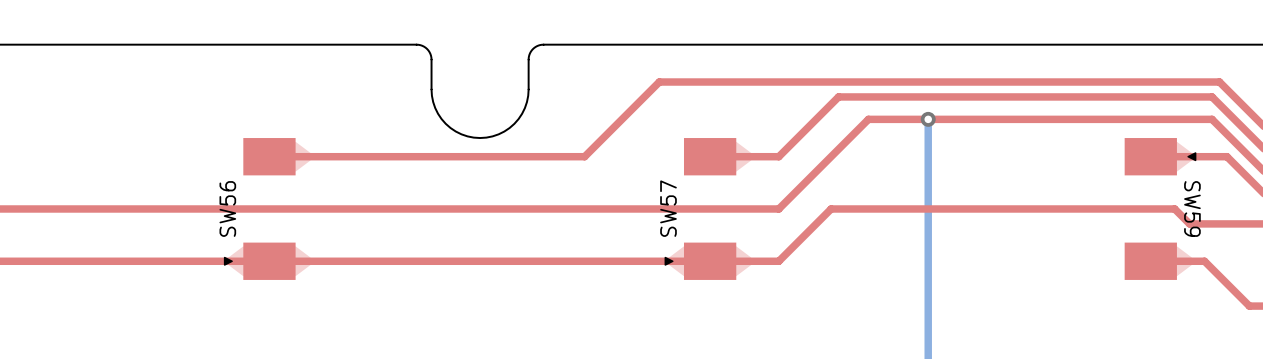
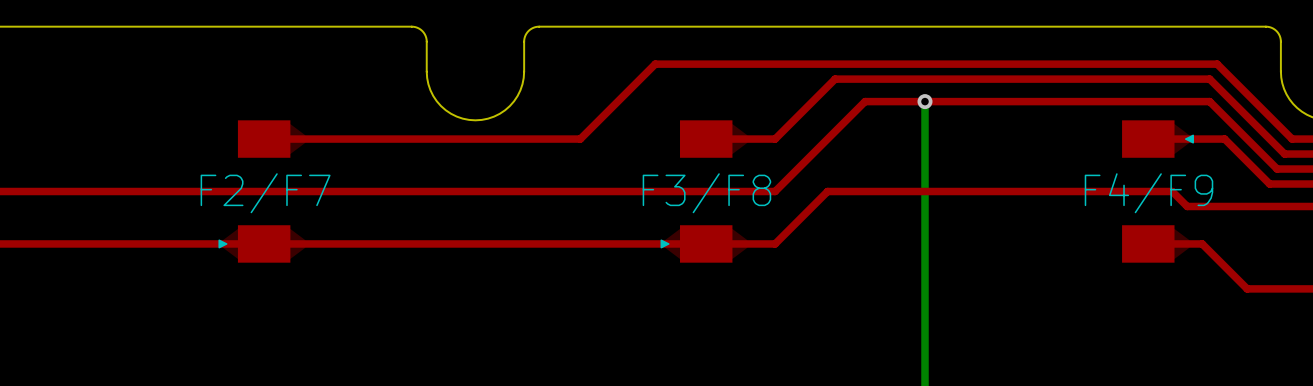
SW56 name: SW56 (227, 208) -> none
SW57 name: SW57 (668, 208) -> none
SW59 name: SW59 (1192, 208) -> none
SW56 value: none -> F2/F7 (265, 193)
SW57 value: none -> F3/F8 (706, 193)
SW59 value: none -> F4/F9 (1148, 193)

